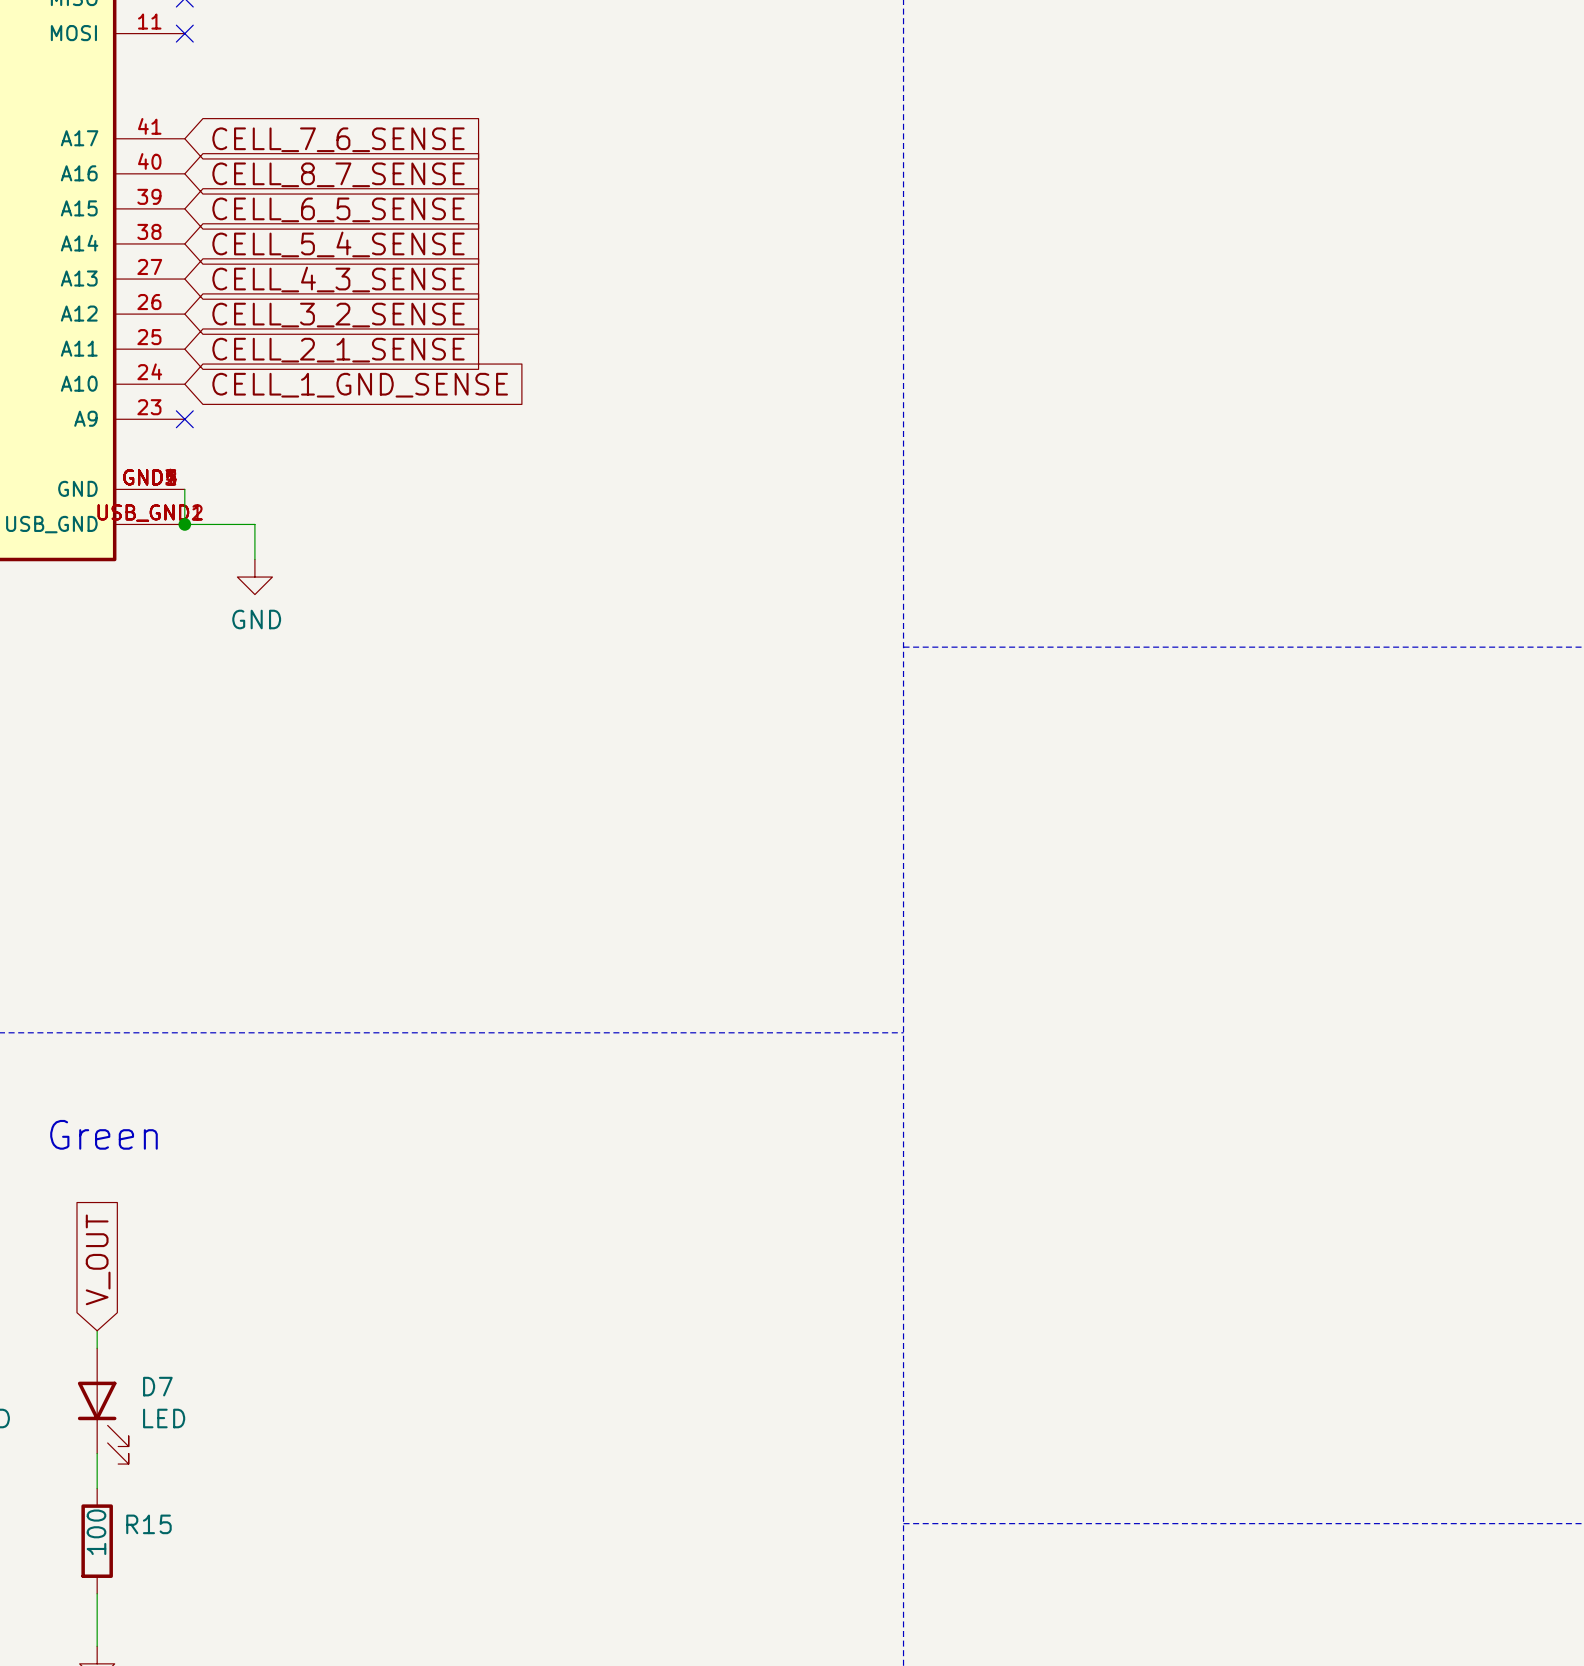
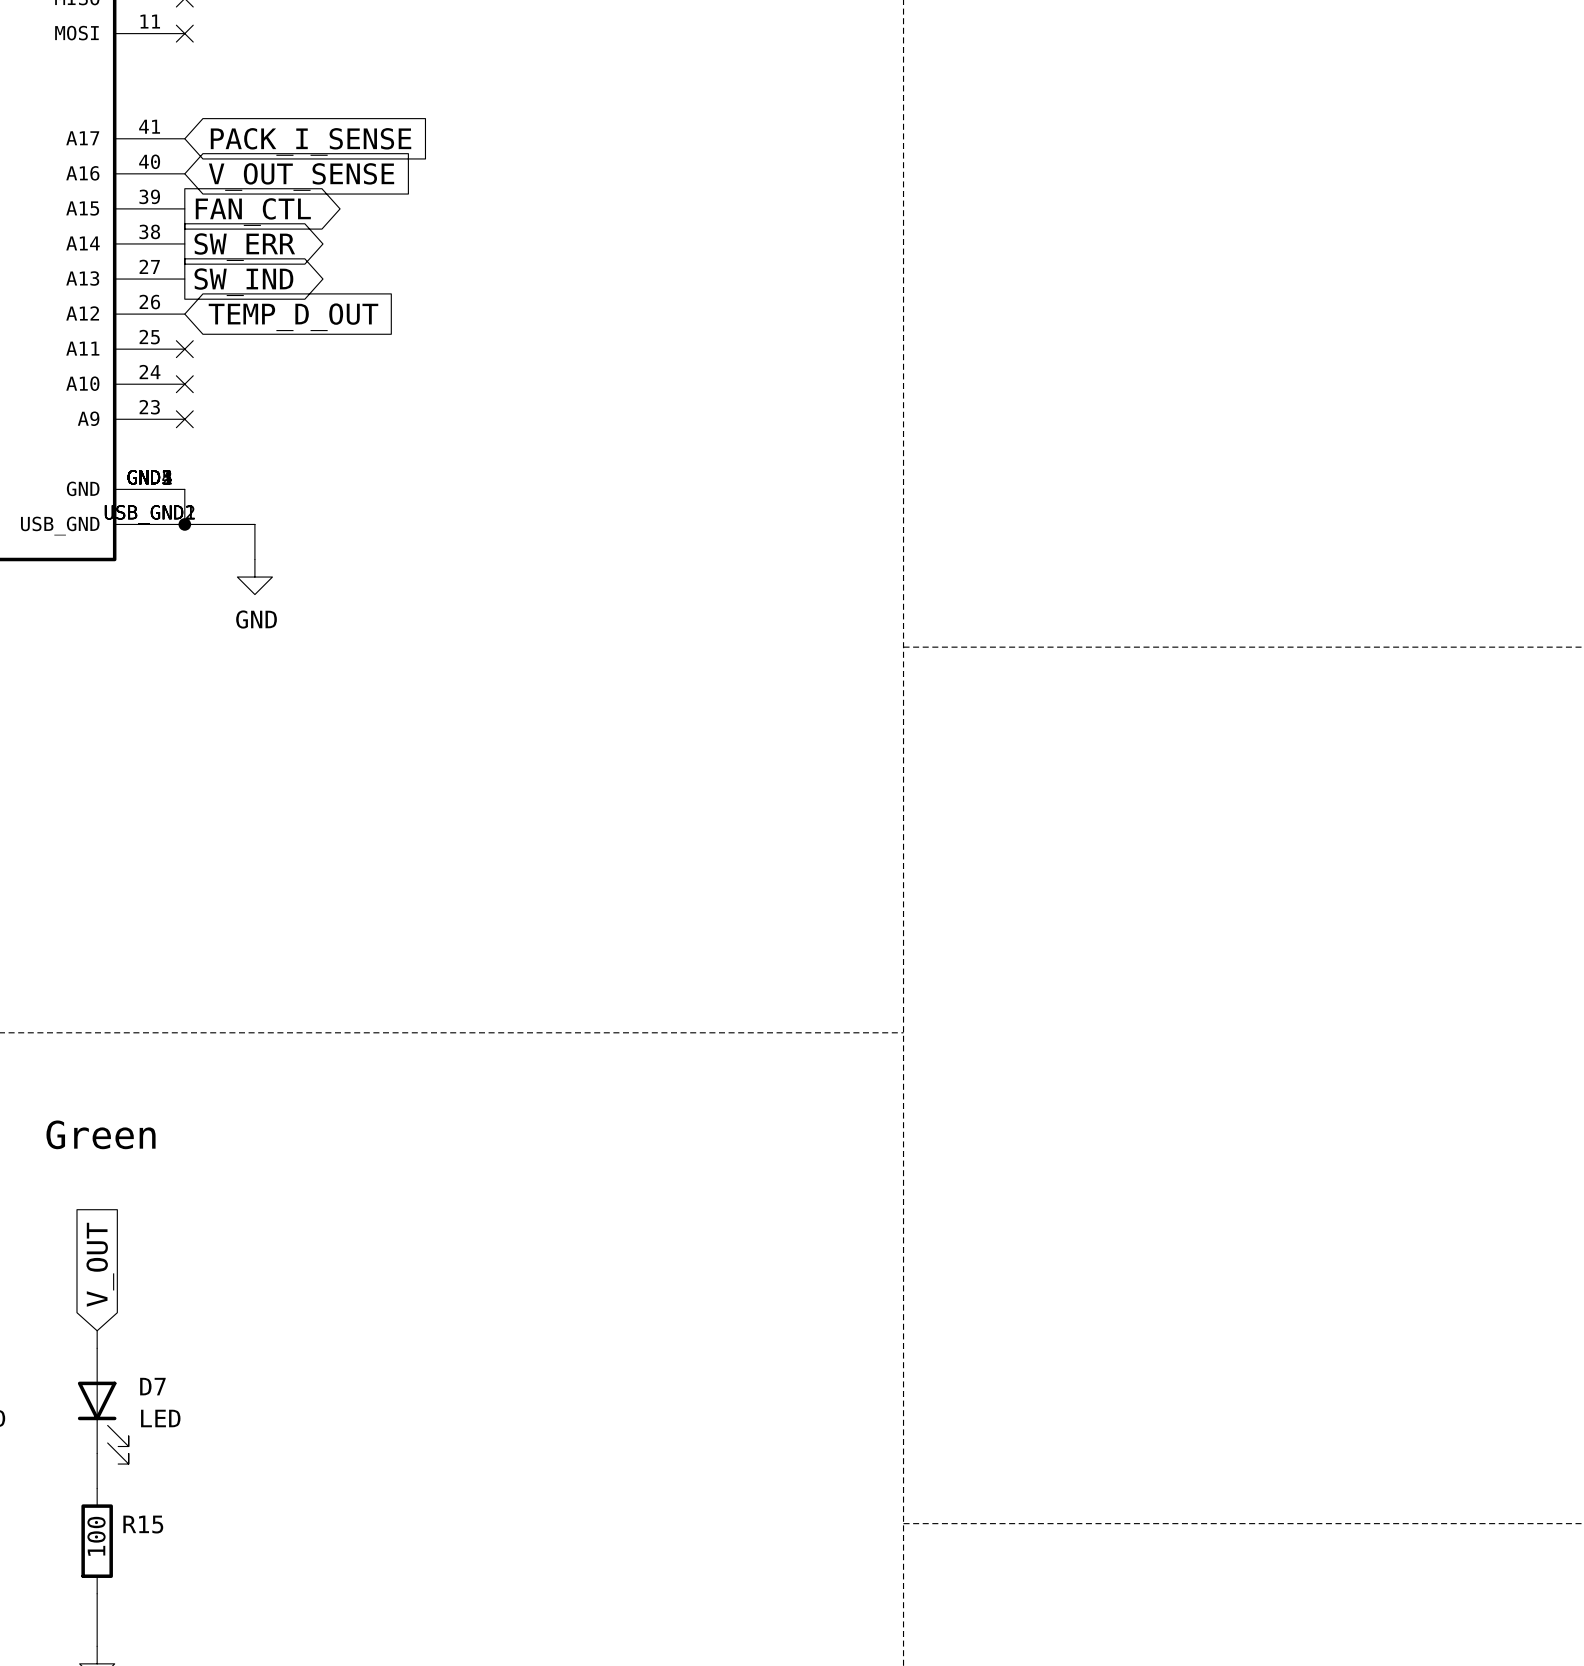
global label: CELL_7_6_SENSE (338, 139) -> PACK_I_SENSE (311, 141)
global label: CELL_8_7_SENSE (338, 174) -> V_OUT_SENSE (301, 177)
global label shape: input (338, 209) -> output (253, 212)
global label: CELL_6_5_SENSE (338, 209) -> FAN_CTL (253, 212)
global label shape: input (338, 244) -> output (244, 247)
global label: CELL_5_4_SENSE (338, 244) -> SW_ERR (244, 247)
global label shape: input (338, 279) -> output (243, 282)
global label: CELL_4_3_SENSE (338, 279) -> SW_IND (243, 282)
global label: CELL_3_2_SENSE (338, 315) -> TEMP_D_OUT (293, 317)
no-connect mark: none -> (184, 349)
global label: CELL_2_1_SENSE (338, 350) -> none
no-connect mark: none -> (184, 384)
global label: CELL_1_GND_SENSE (360, 385) -> none

